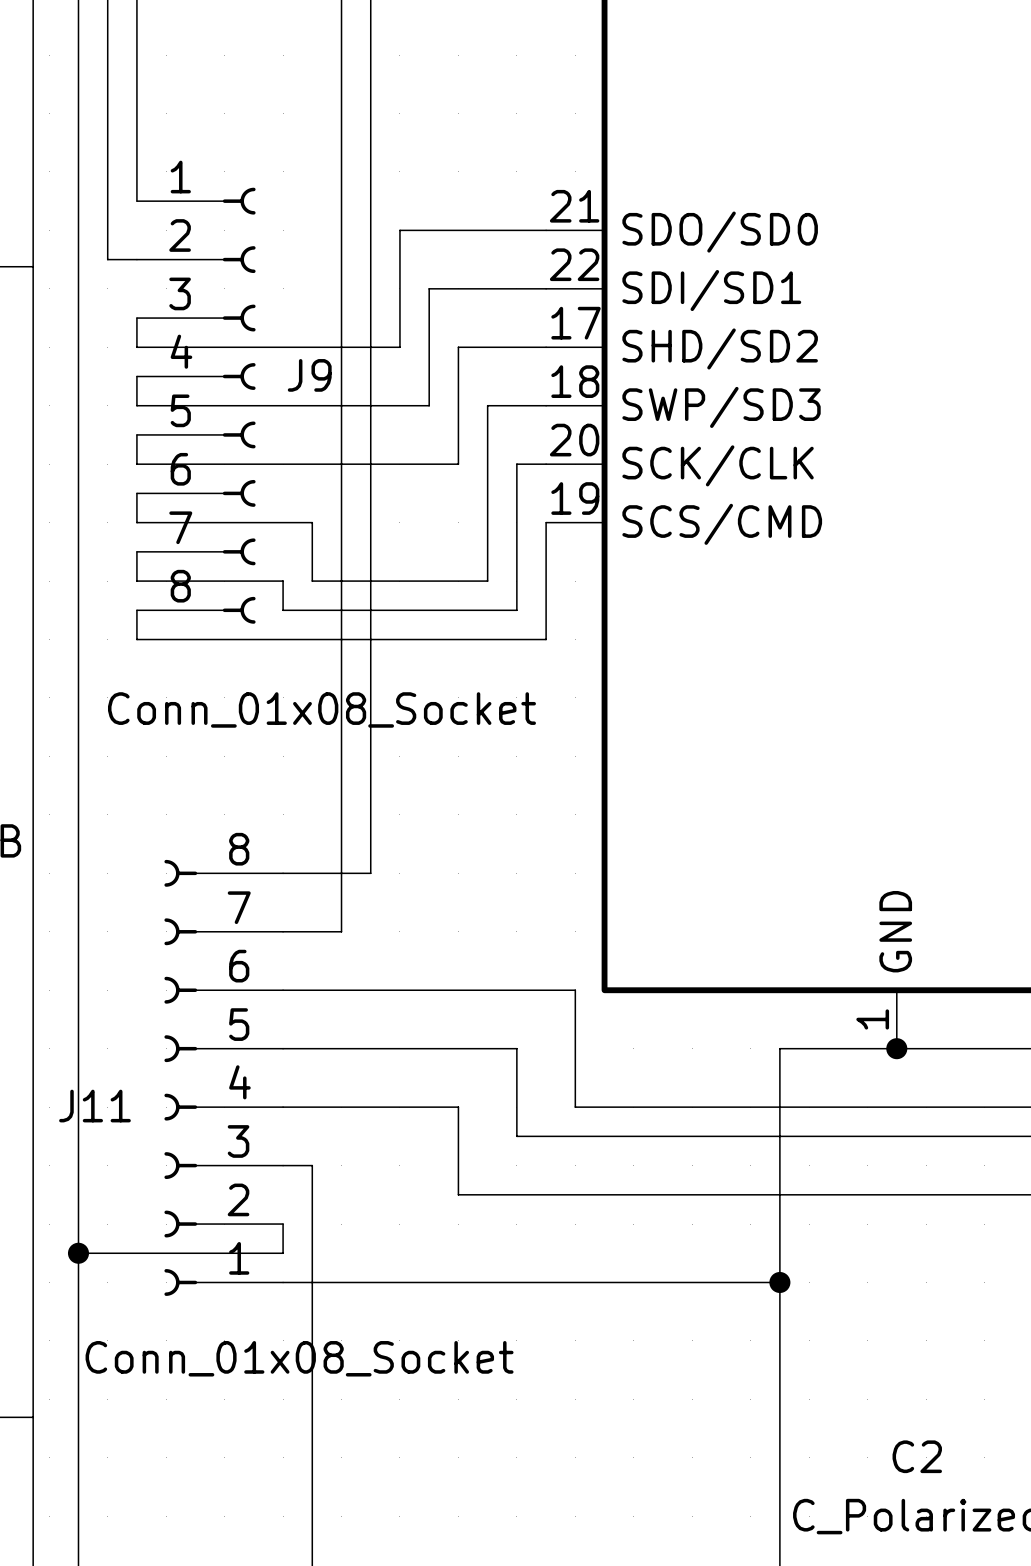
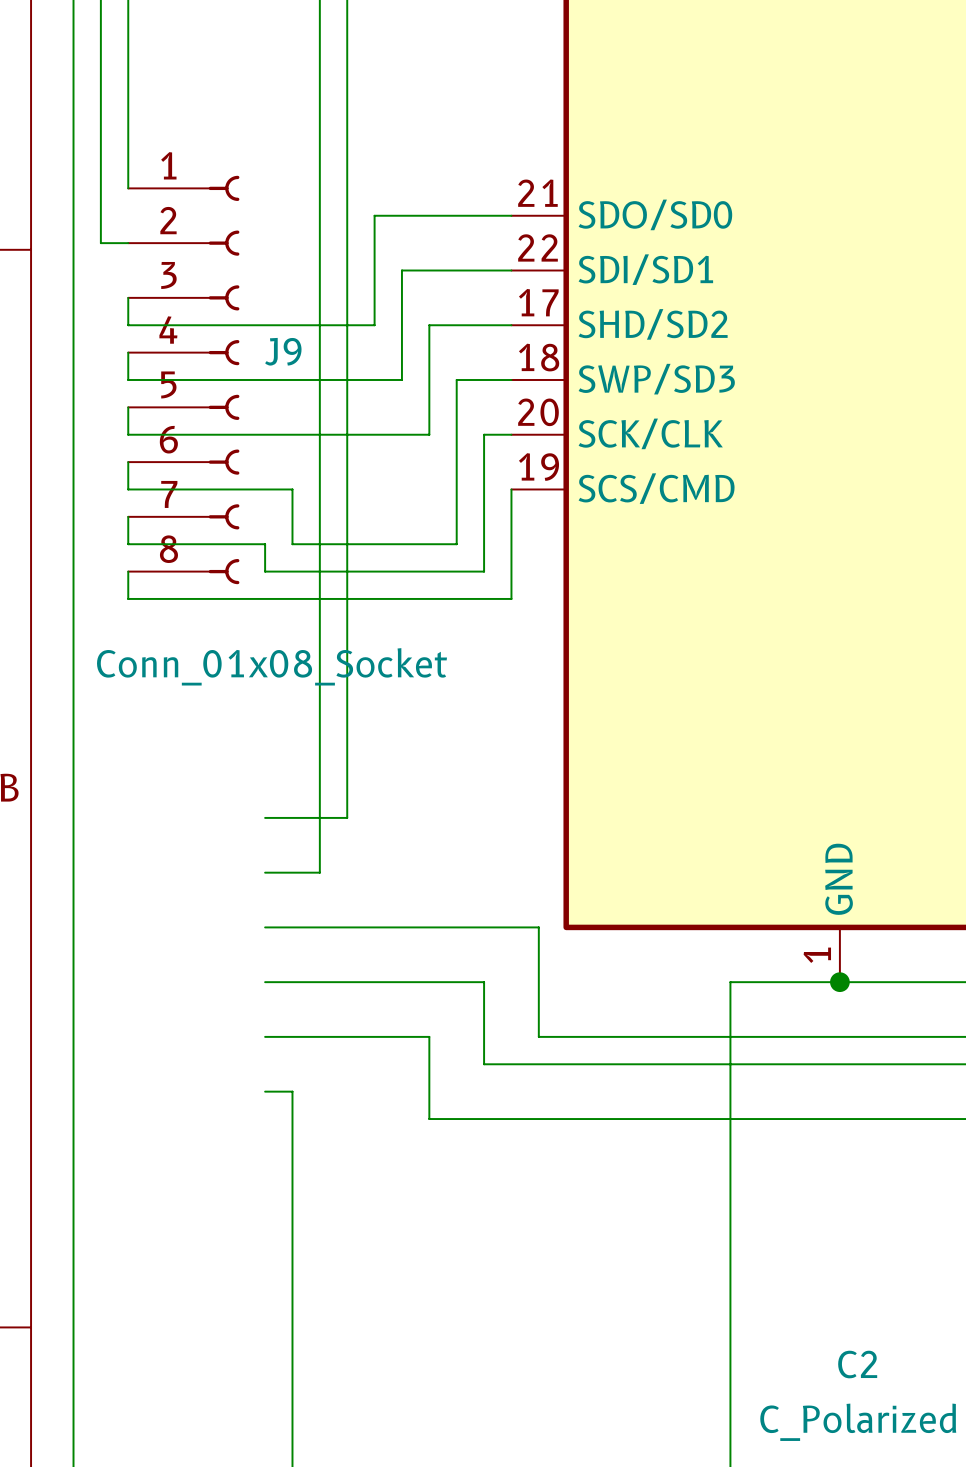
J11: Conn_01x08_Socket (223, 1077) -> none
wire: (283, 1224) (283, 1253) (78, 1253) -> none
junction: (78, 1253) -> none
wire: (283, 1282) (779, 1282) -> none
junction: (779, 1282) -> none

